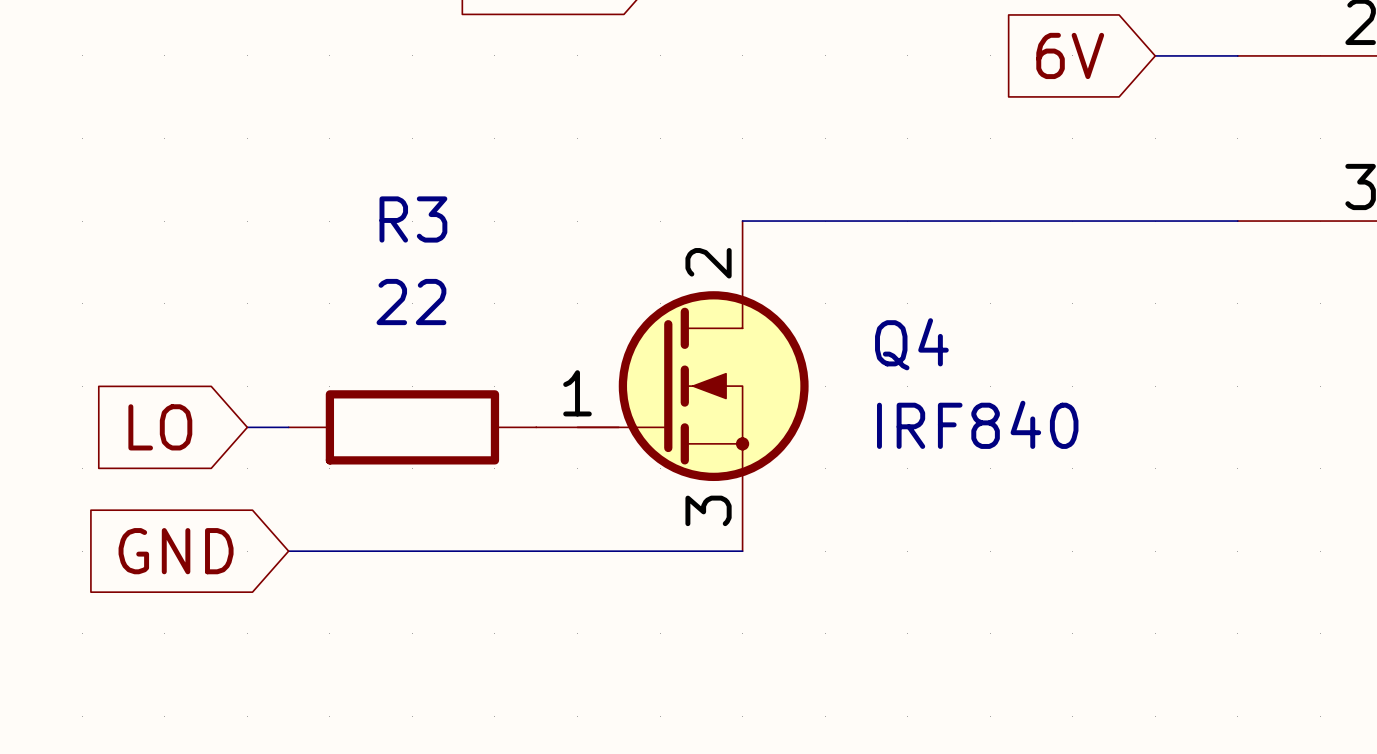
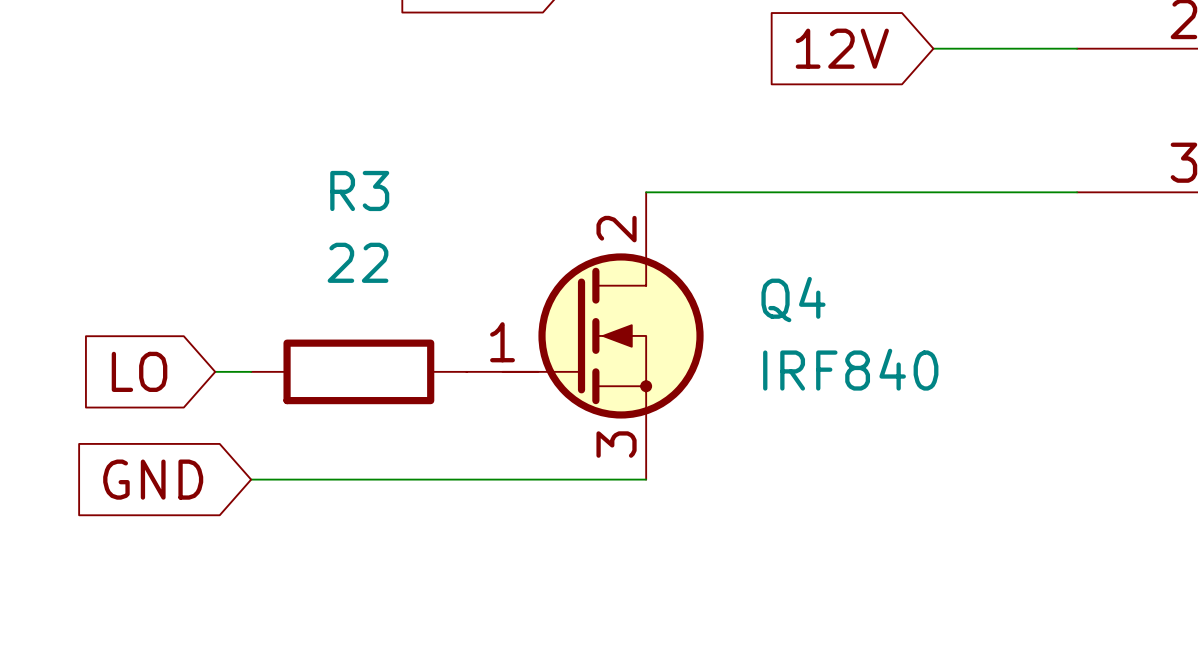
global label: none -> 12V (842, 48)
global label: 6V (1070, 55) -> none
wire: none -> (933, 48) (1005, 48)

